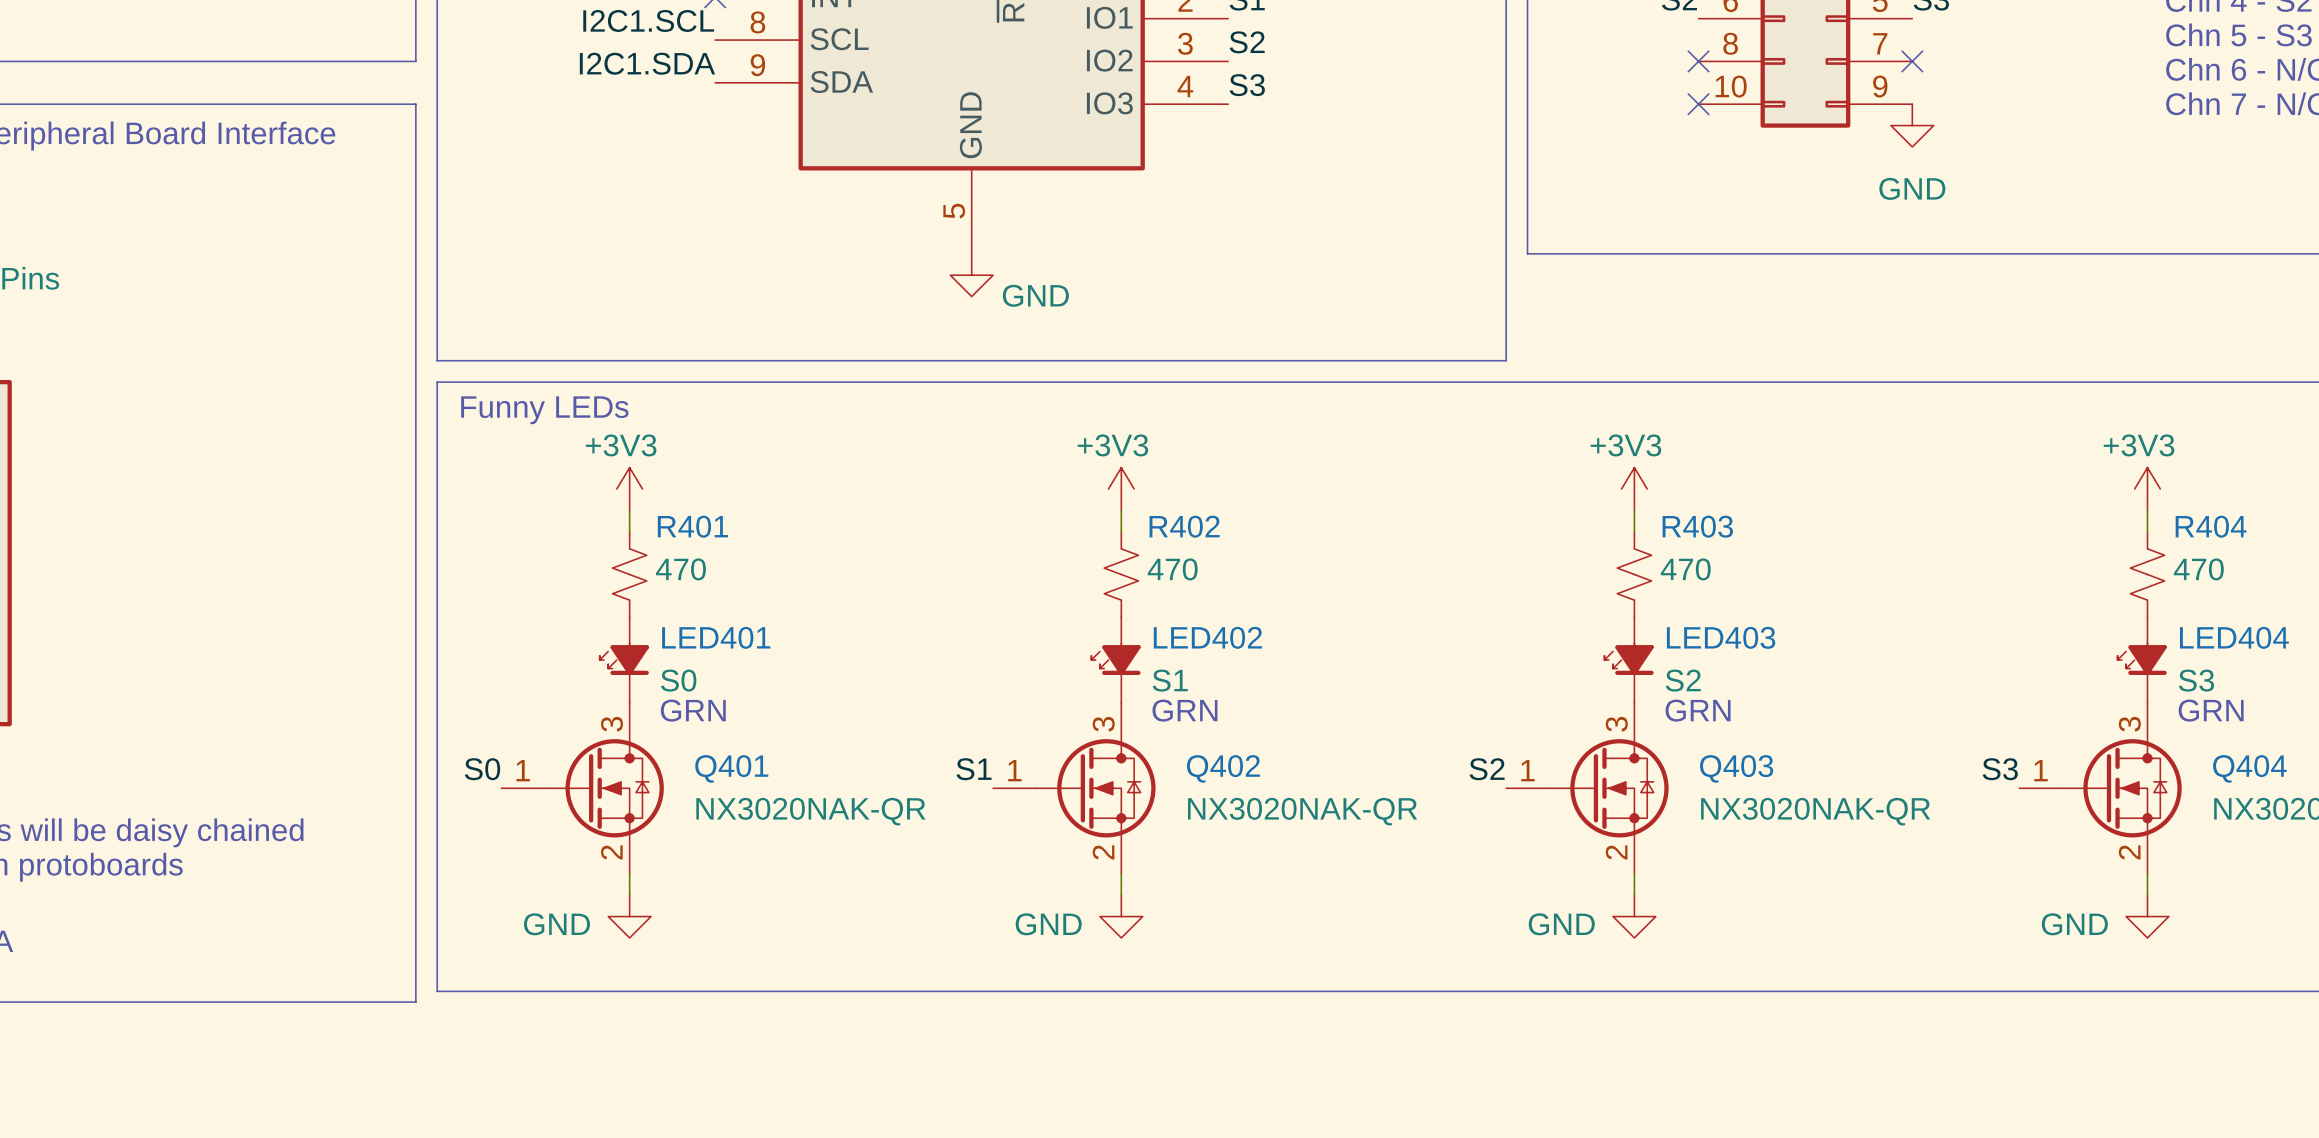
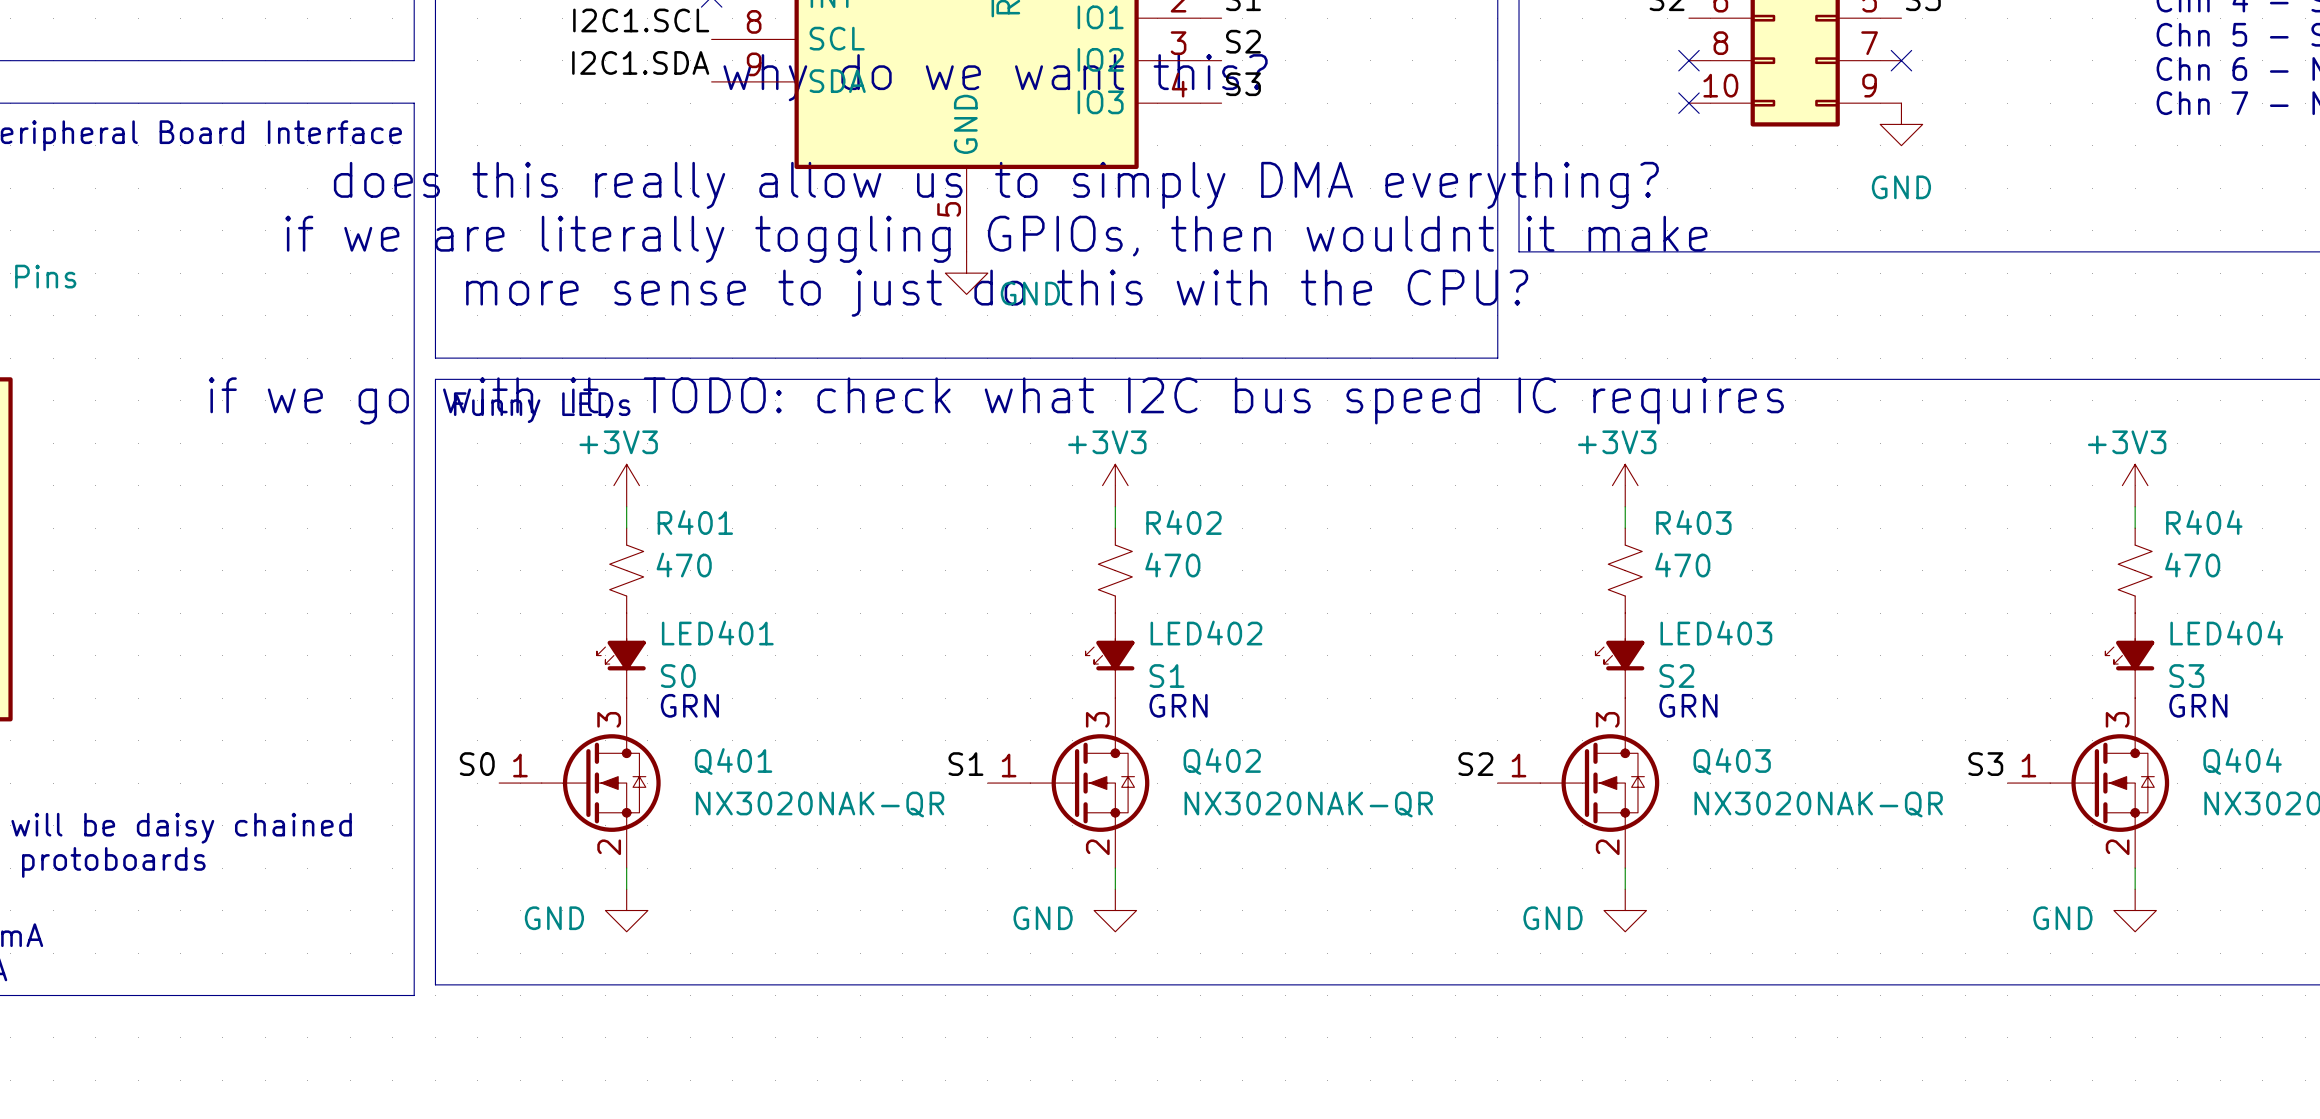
text: none -> why do we want this? (995, 77)
text: none -> does this really allow us to simply DMA everything? (996, 185)
text: none -> if we are literally toggling GPIOs, then wouldnt it make (996, 239)
text: none -> more sense to just do this with the CPU? (997, 293)
text: none -> if we go with it, TODO: check what I2C bus speed IC requires (996, 400)

